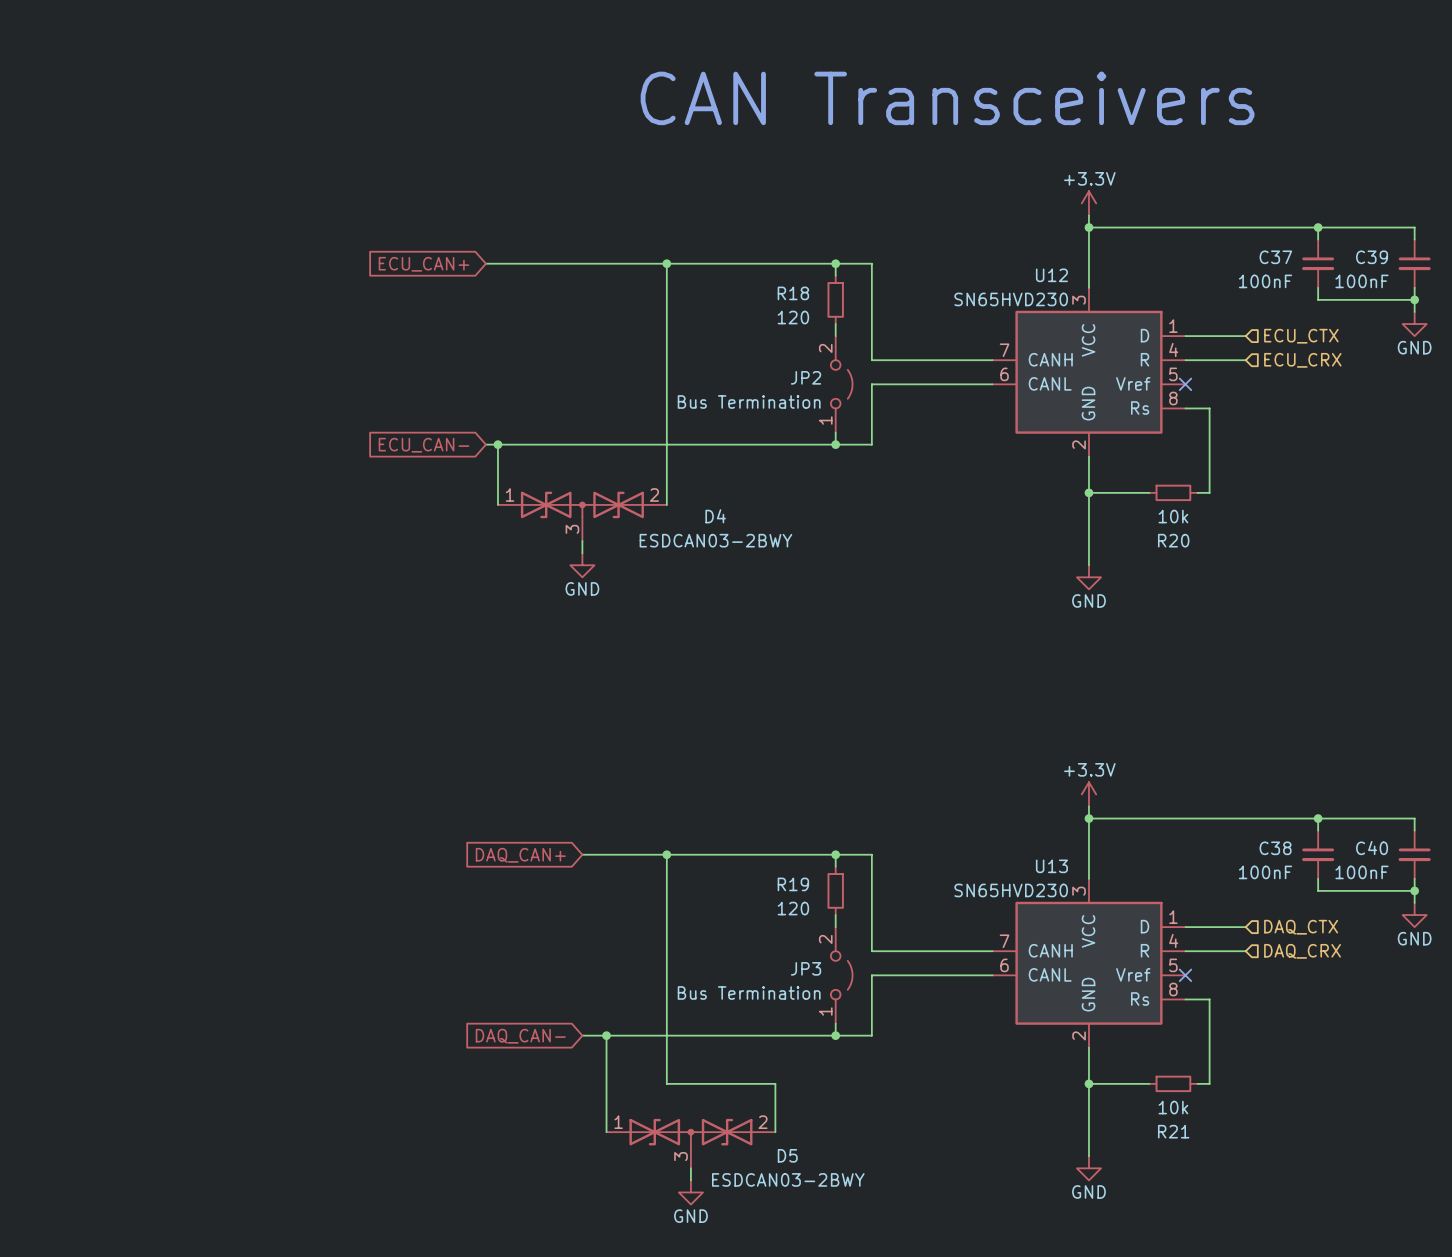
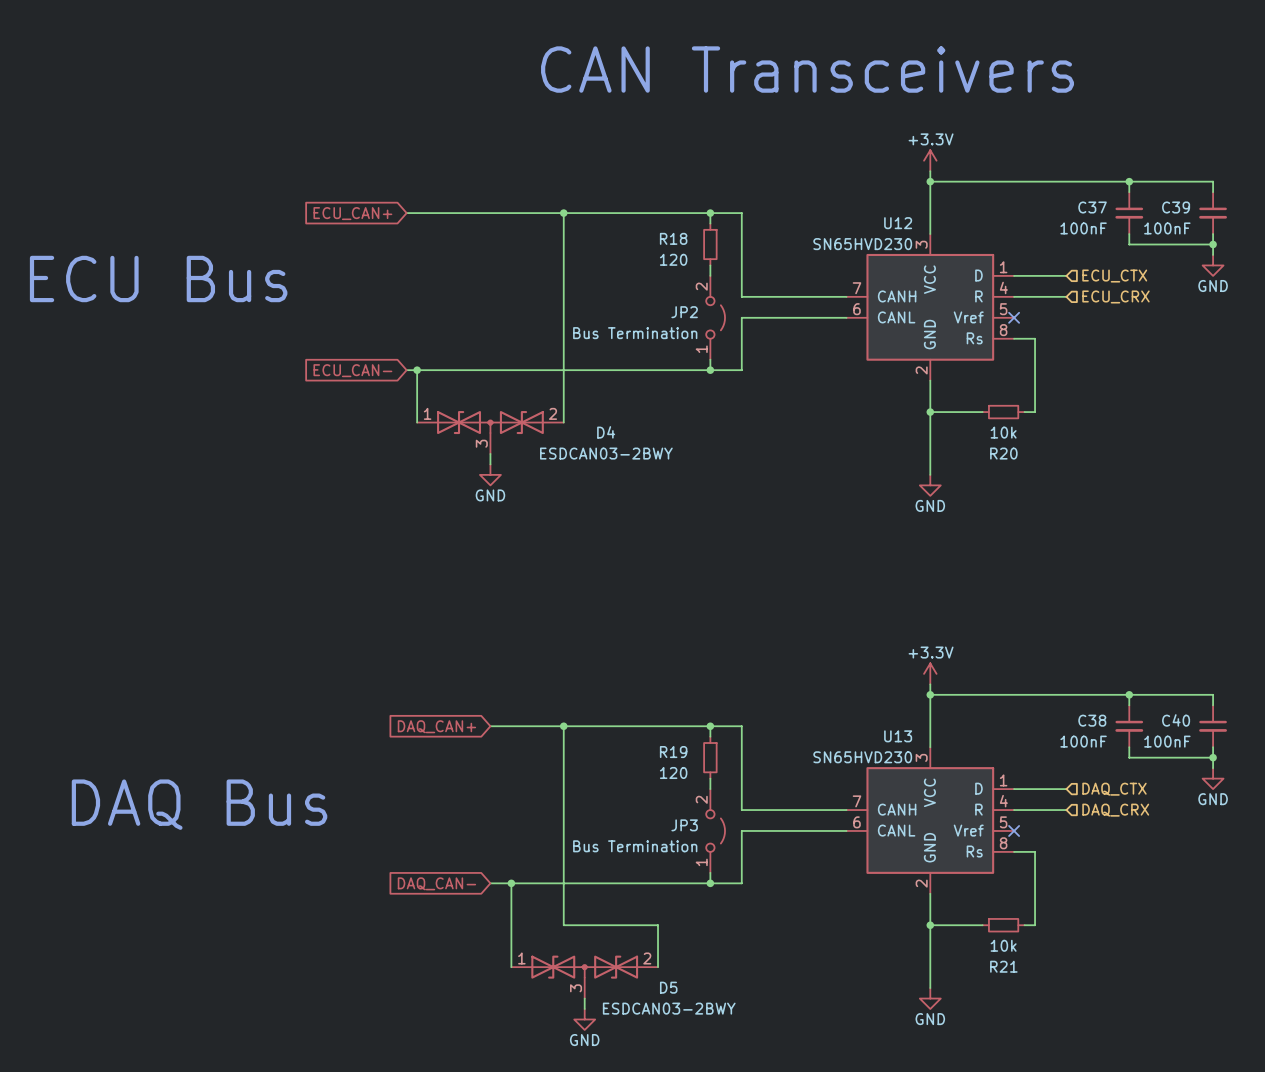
text: none -> ECU Bus (158, 278)
text: none -> DAQ Bus (199, 804)

